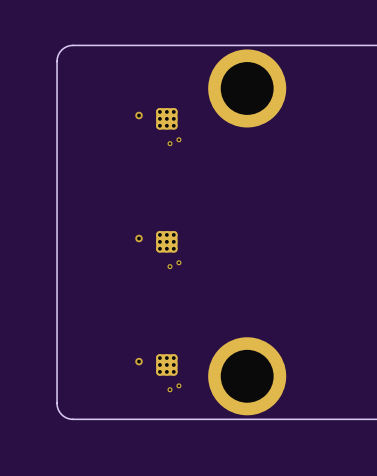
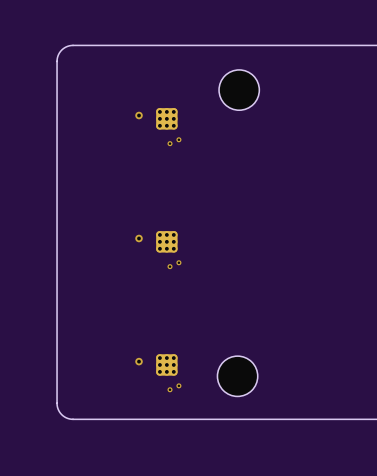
part footprint: [208, 49, 287, 128] -> [219, 69, 260, 111]
part footprint: [208, 337, 287, 416] -> [217, 356, 258, 397]

